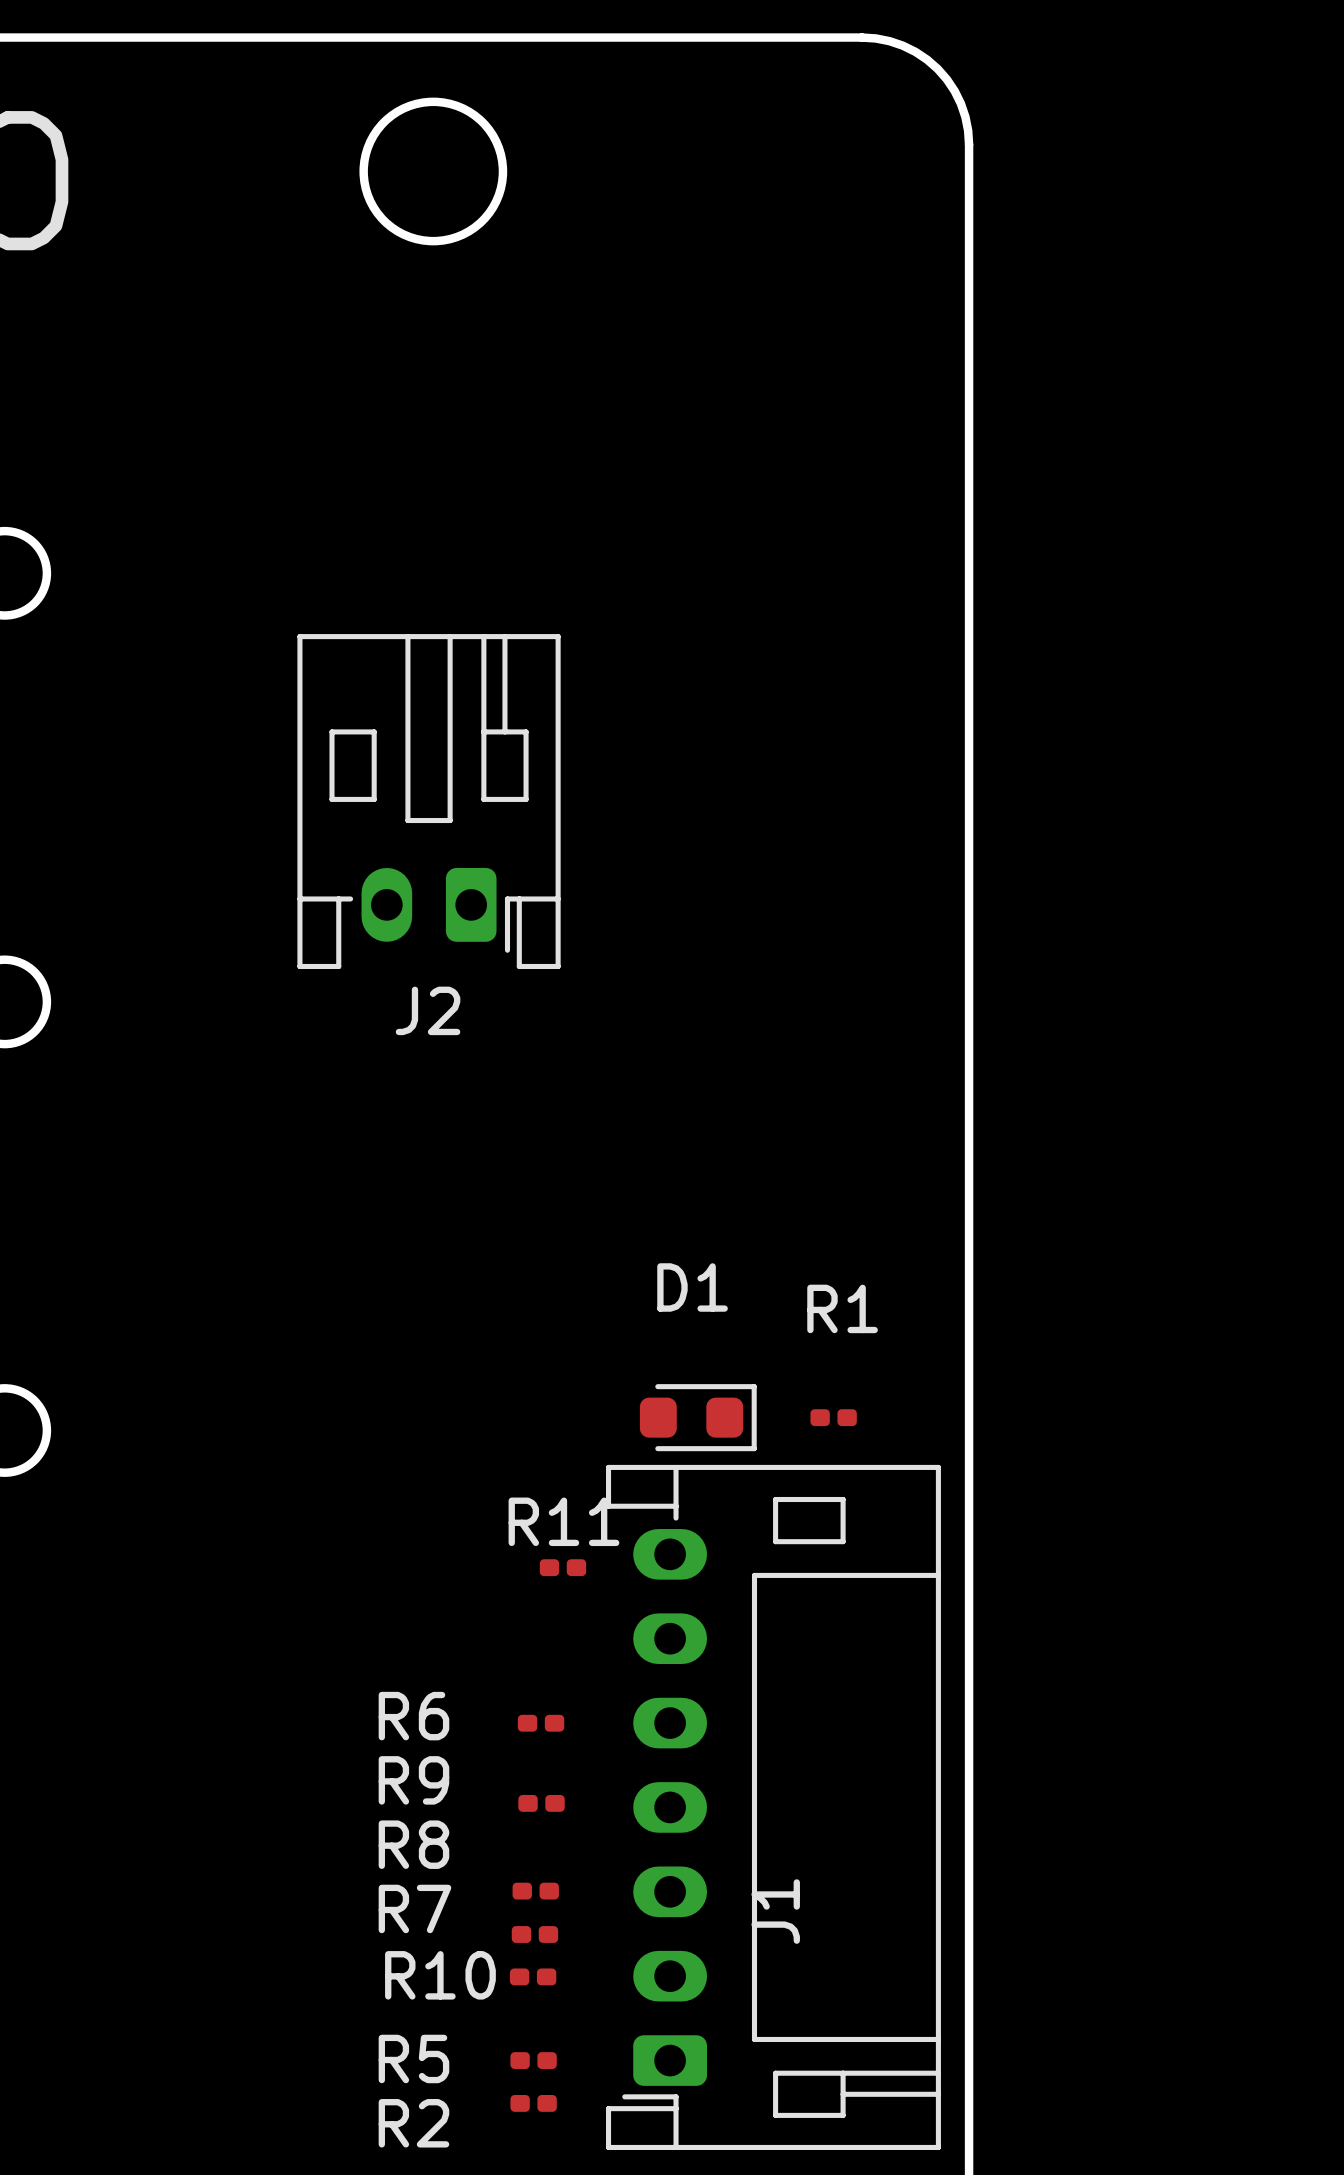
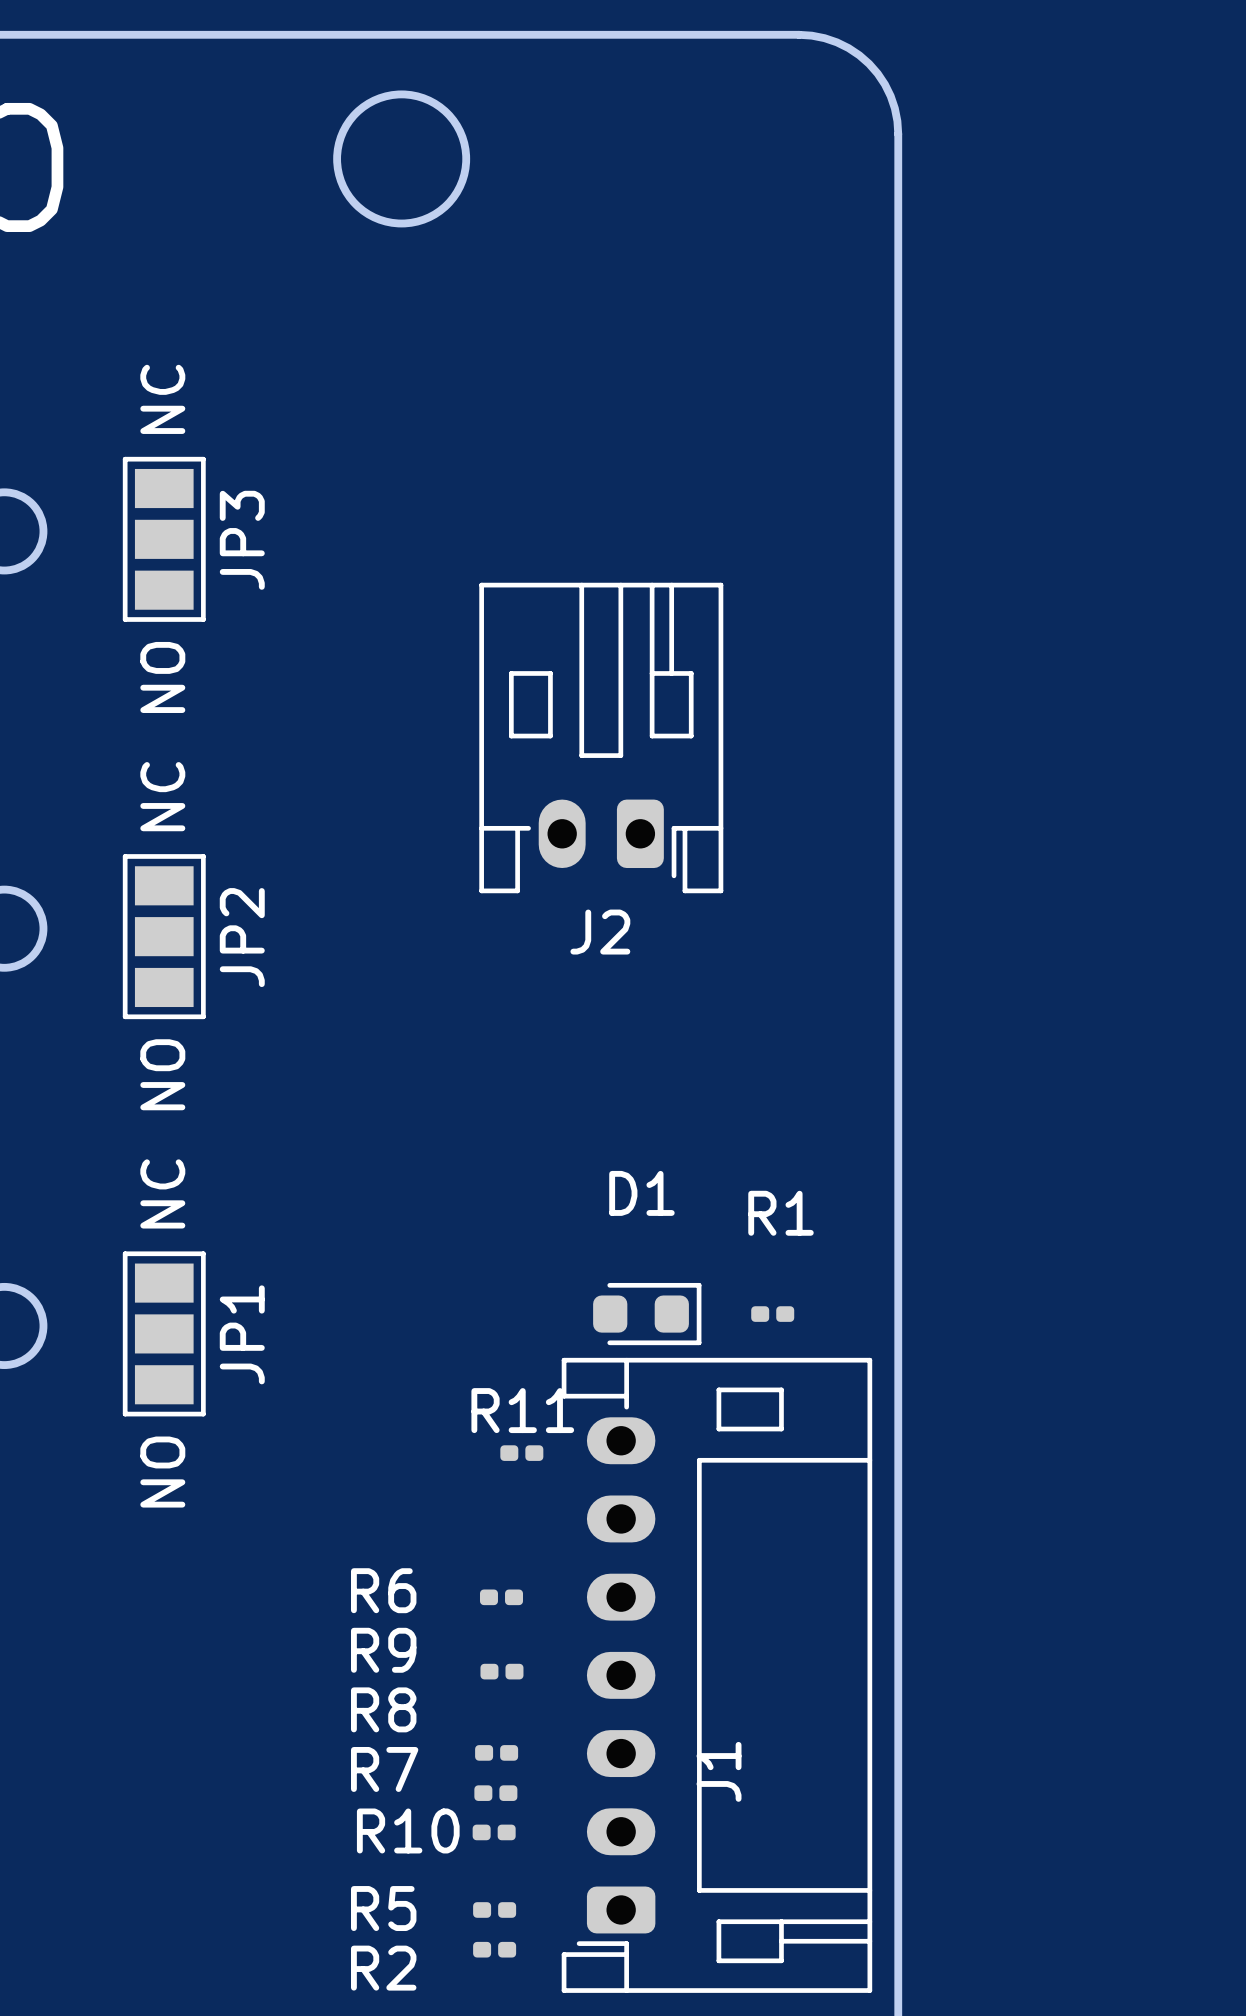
JP3: none -> (164, 539)
J2 position: (429, 801) -> (601, 737)
JP2: none -> (164, 936)
JP1: none -> (164, 1333)

